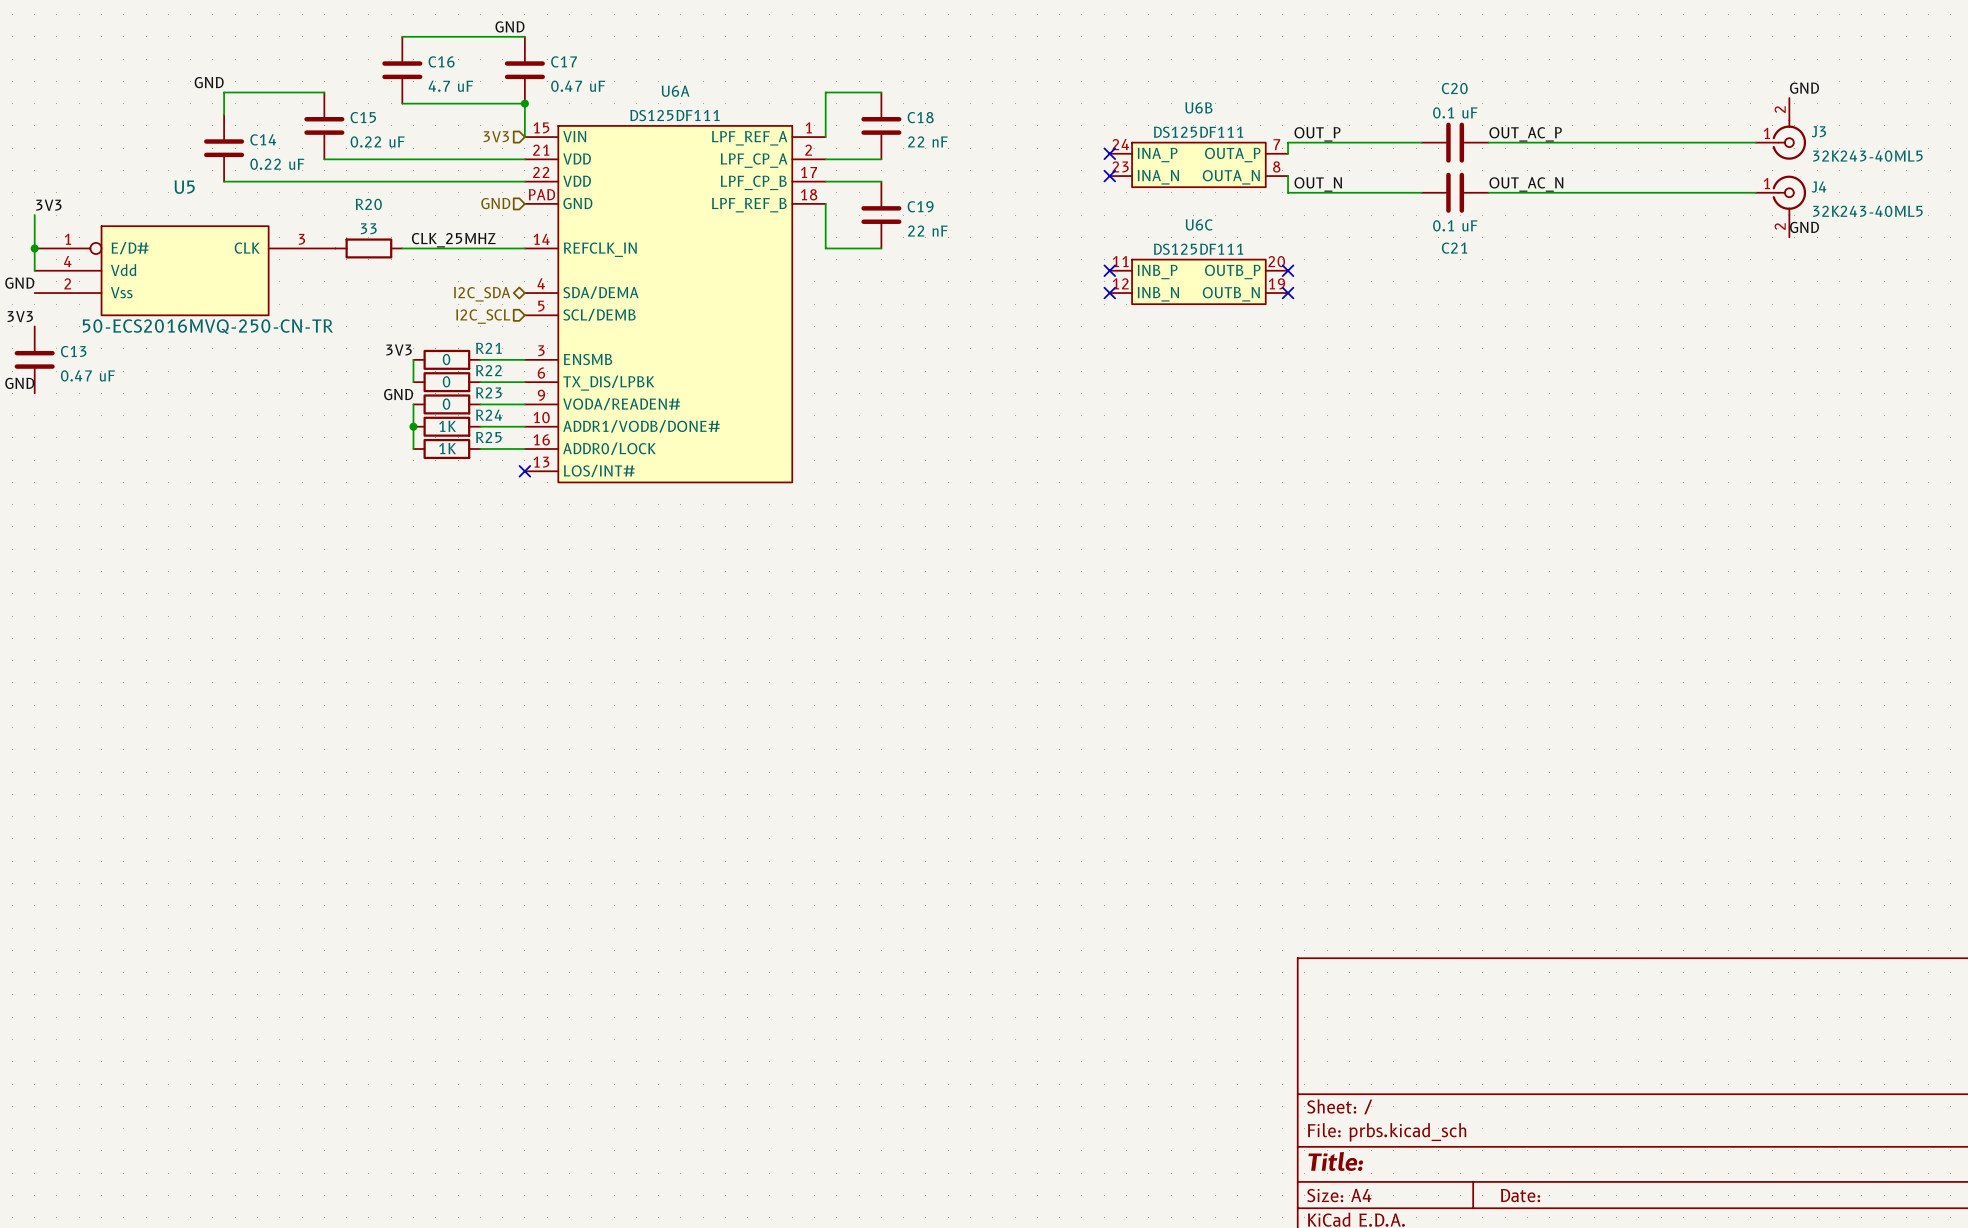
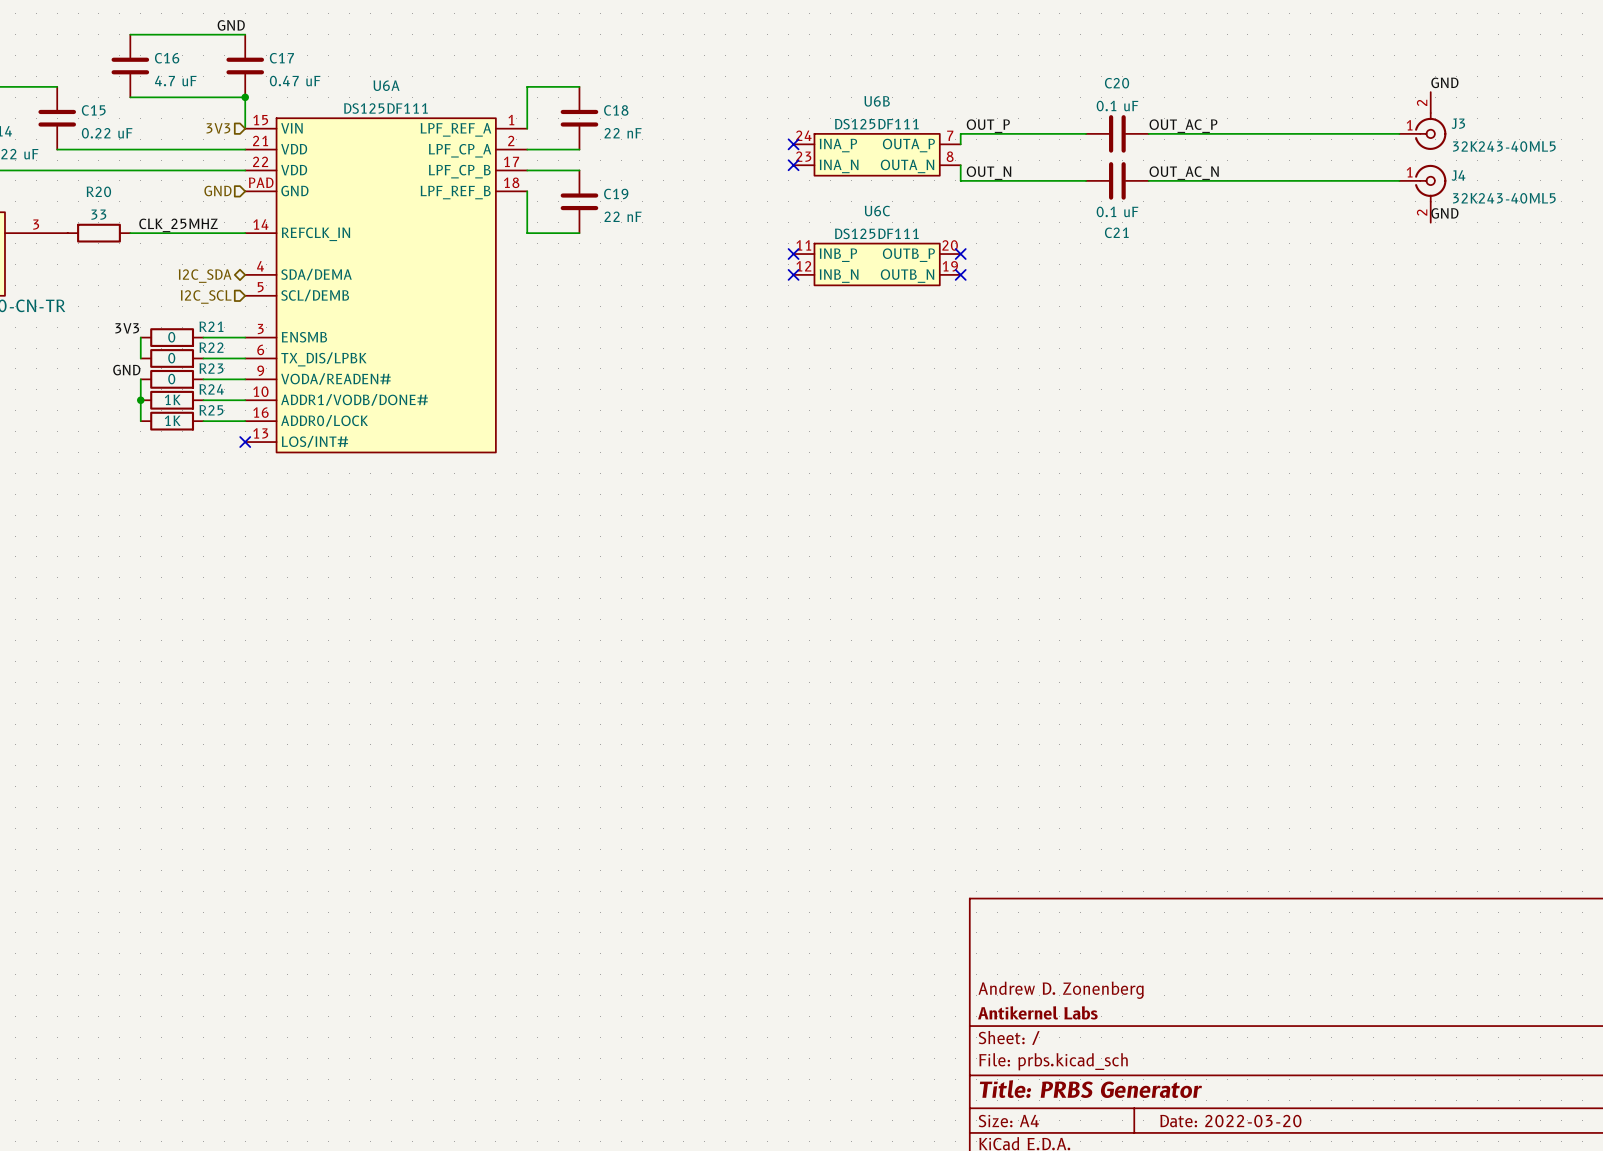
title block: none -> Andrew D. Zonenberg (1061, 990)
title block: none -> Antikernel Labs (1037, 1012)
title block: Title: (1335, 1161) -> Title: PRBS Generator (1090, 1089)
title block: Date: (1520, 1195) -> Date: 2022-03-20 (1230, 1121)

